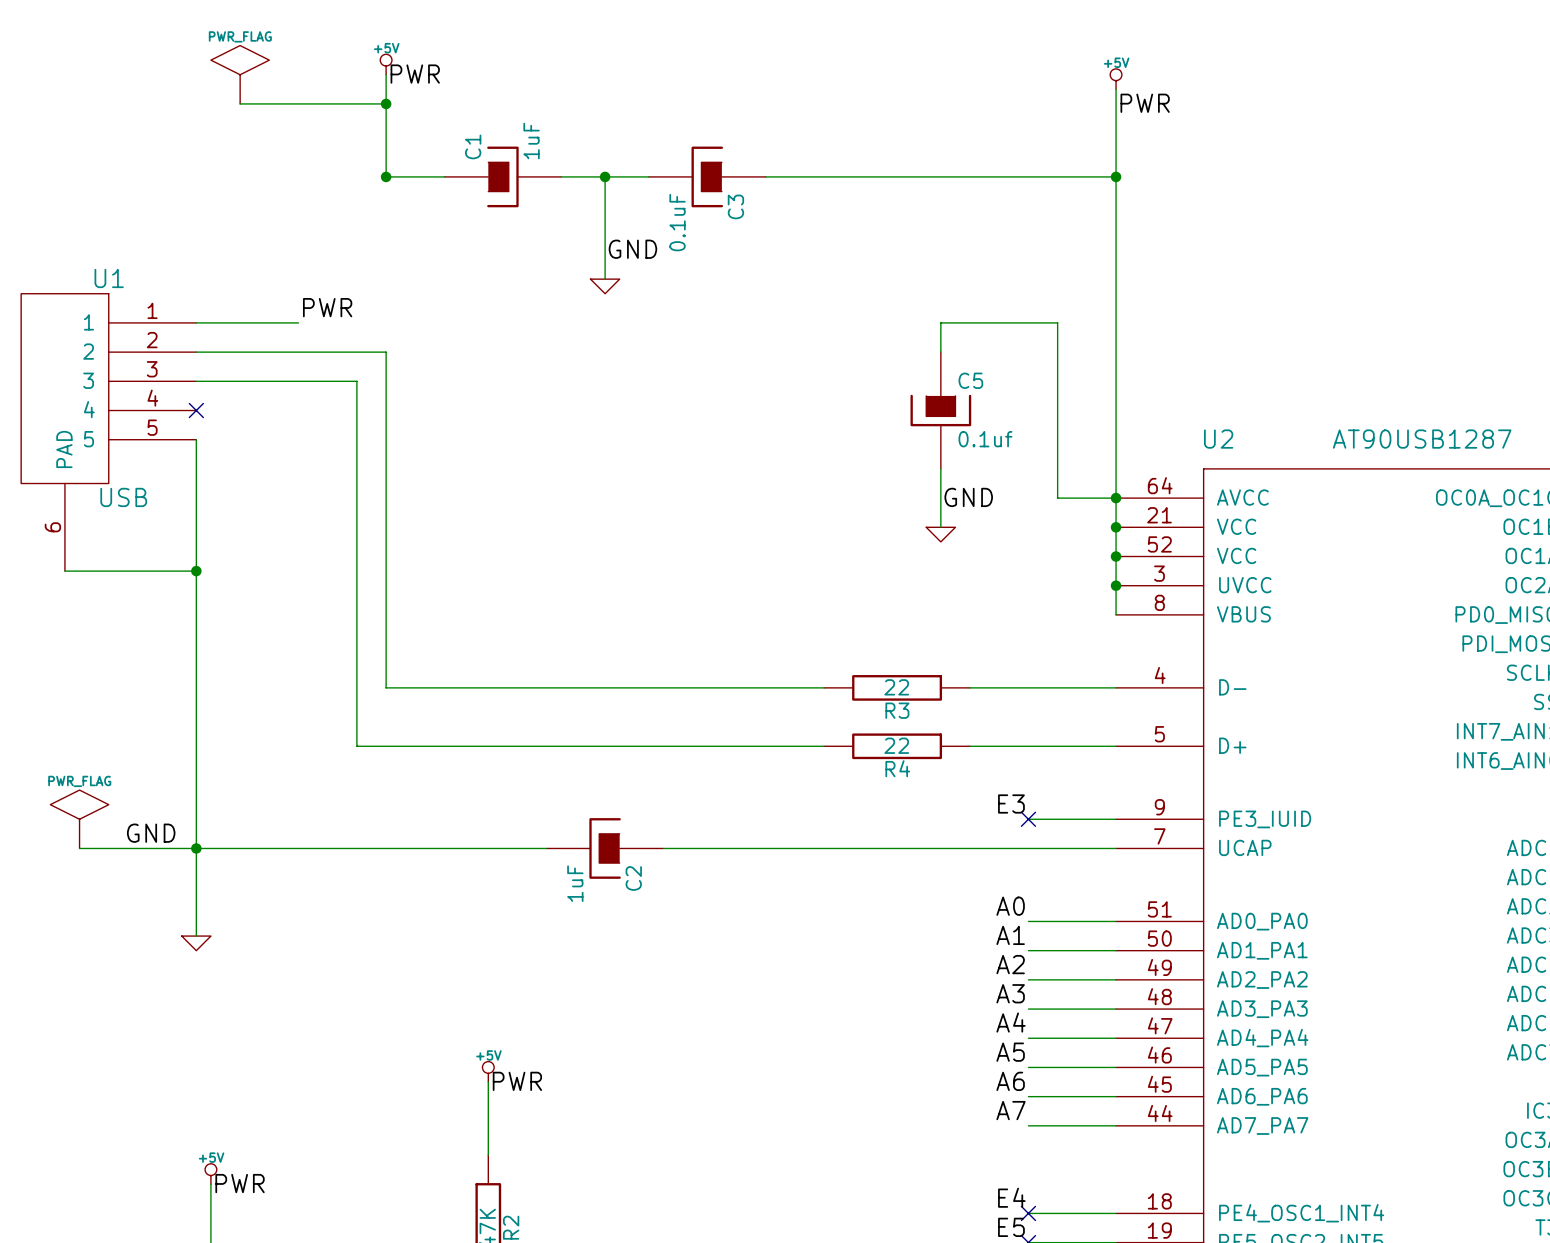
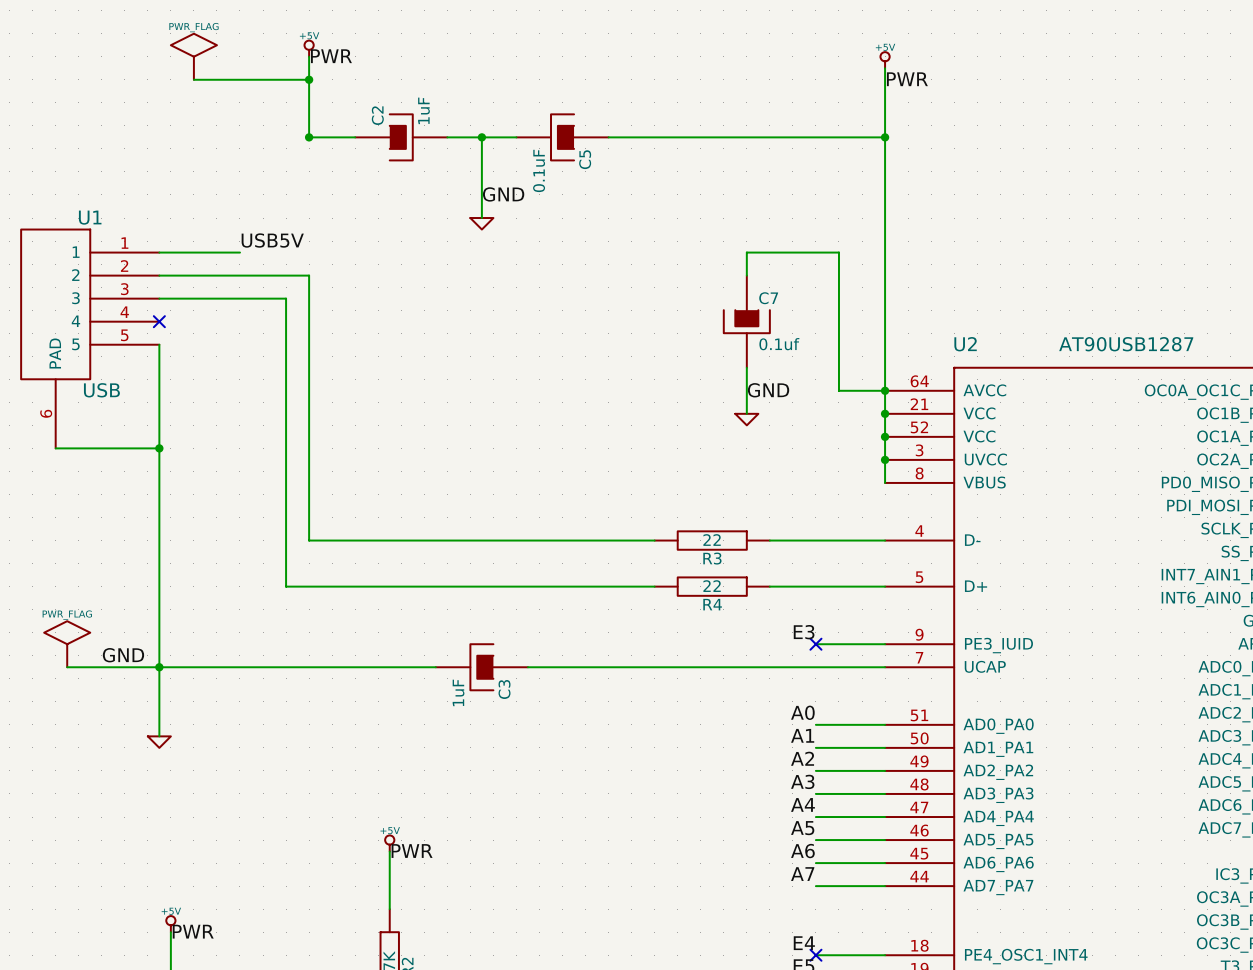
C1 name: C1 (473, 146) -> C2 (377, 115)
C3 name: C3 (735, 206) -> C5 (585, 159)
label: PWR (327, 307) -> USB5V (272, 240)
C5 name: C5 (970, 380) -> C7 (768, 298)
C2 name: C2 (633, 878) -> C3 (504, 689)

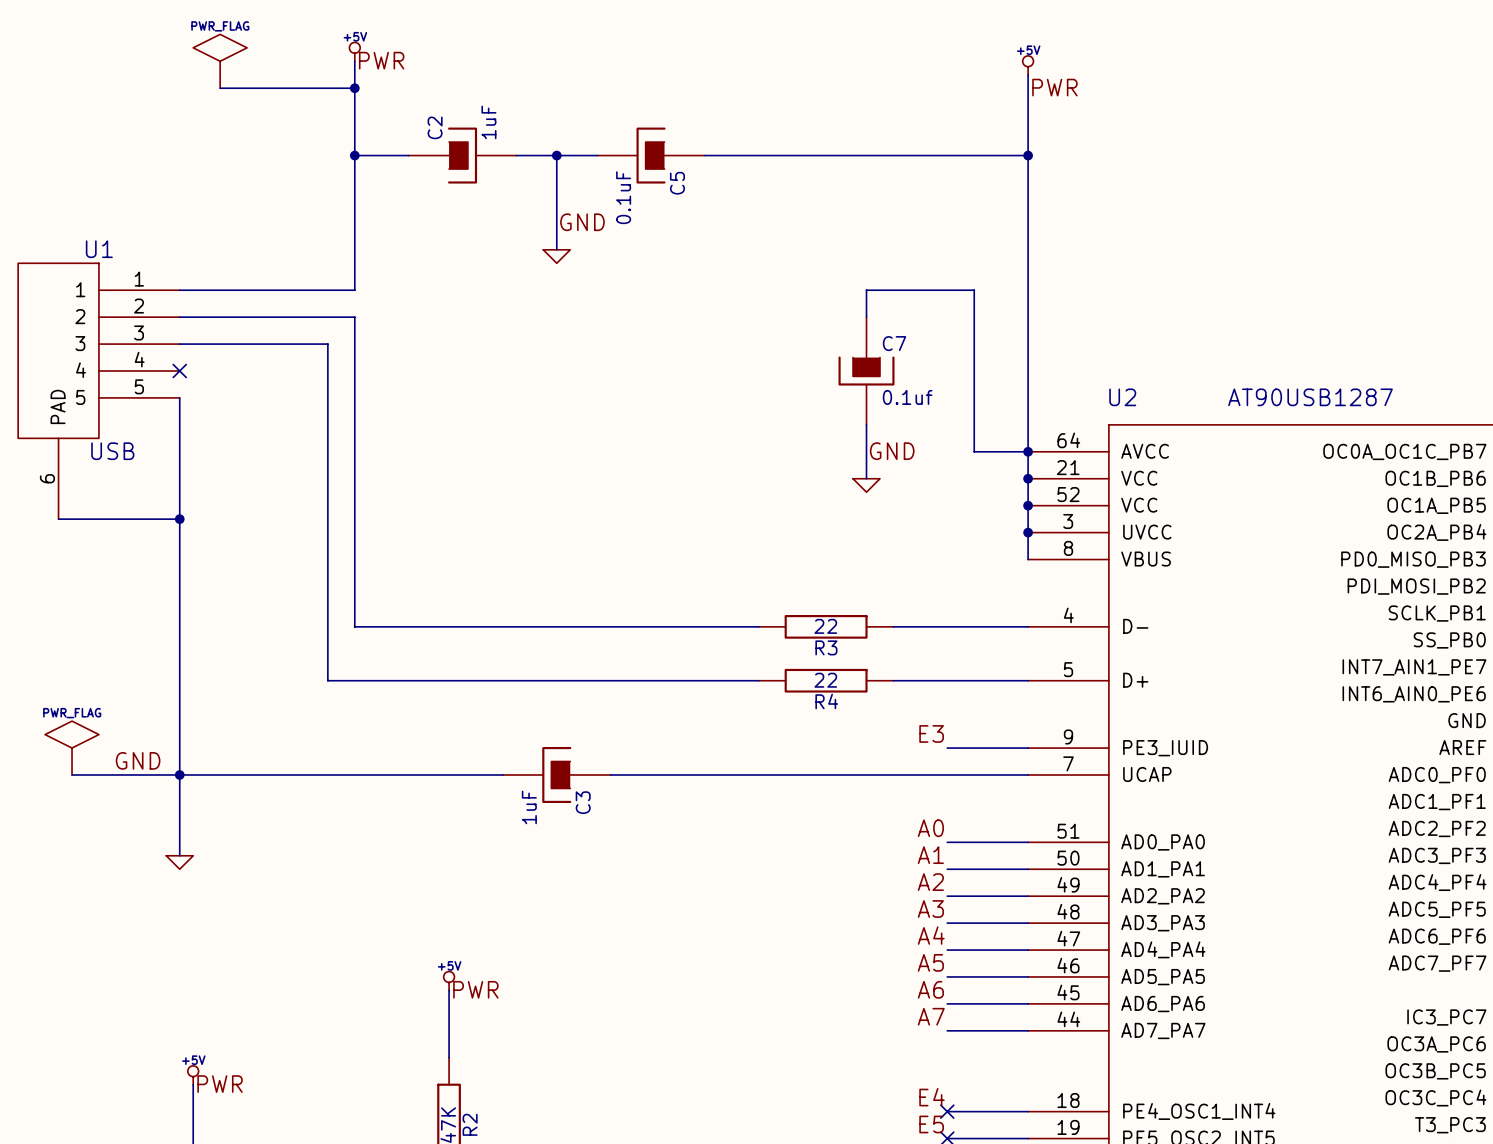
wire: none -> (354, 155) (354, 290) (274, 290)
label: USB5V (272, 240) -> none
no-connect mark: (815, 644) -> none

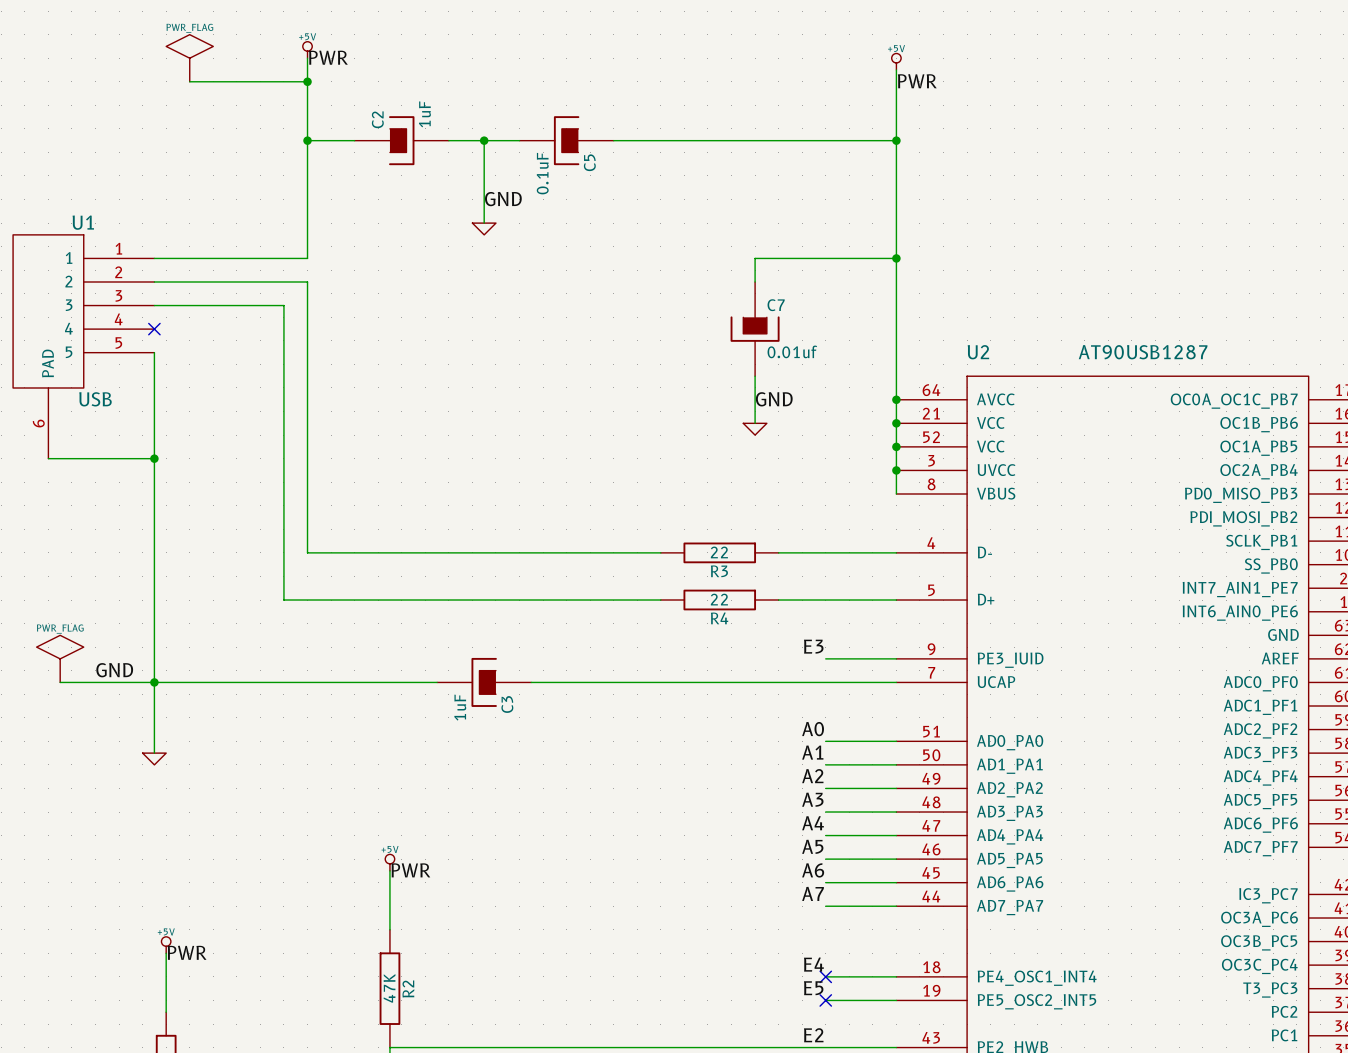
wire: (974, 290) (974, 451) (1028, 451) -> (849, 258) (896, 258)
junction: none -> (896, 258)
C7 value: 0.1uf (907, 397) -> 0.01uf (792, 351)

